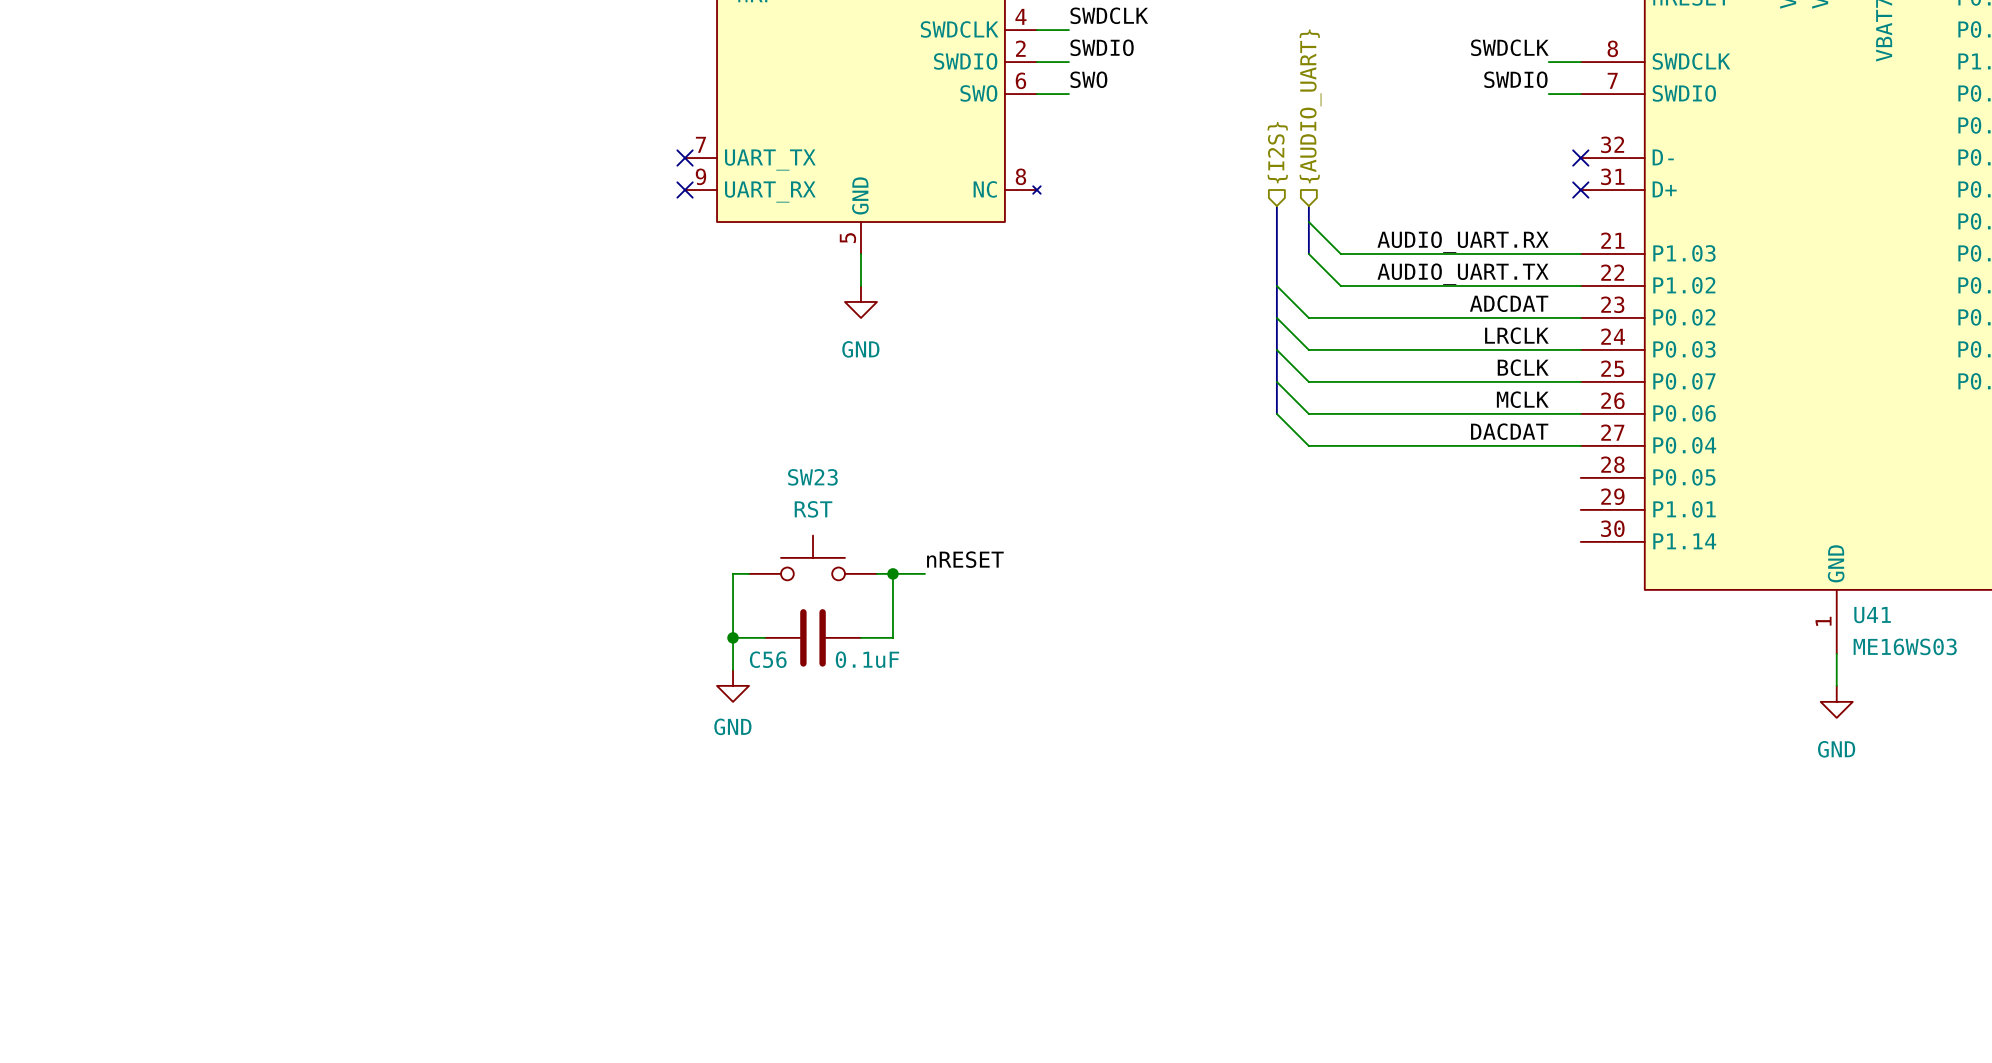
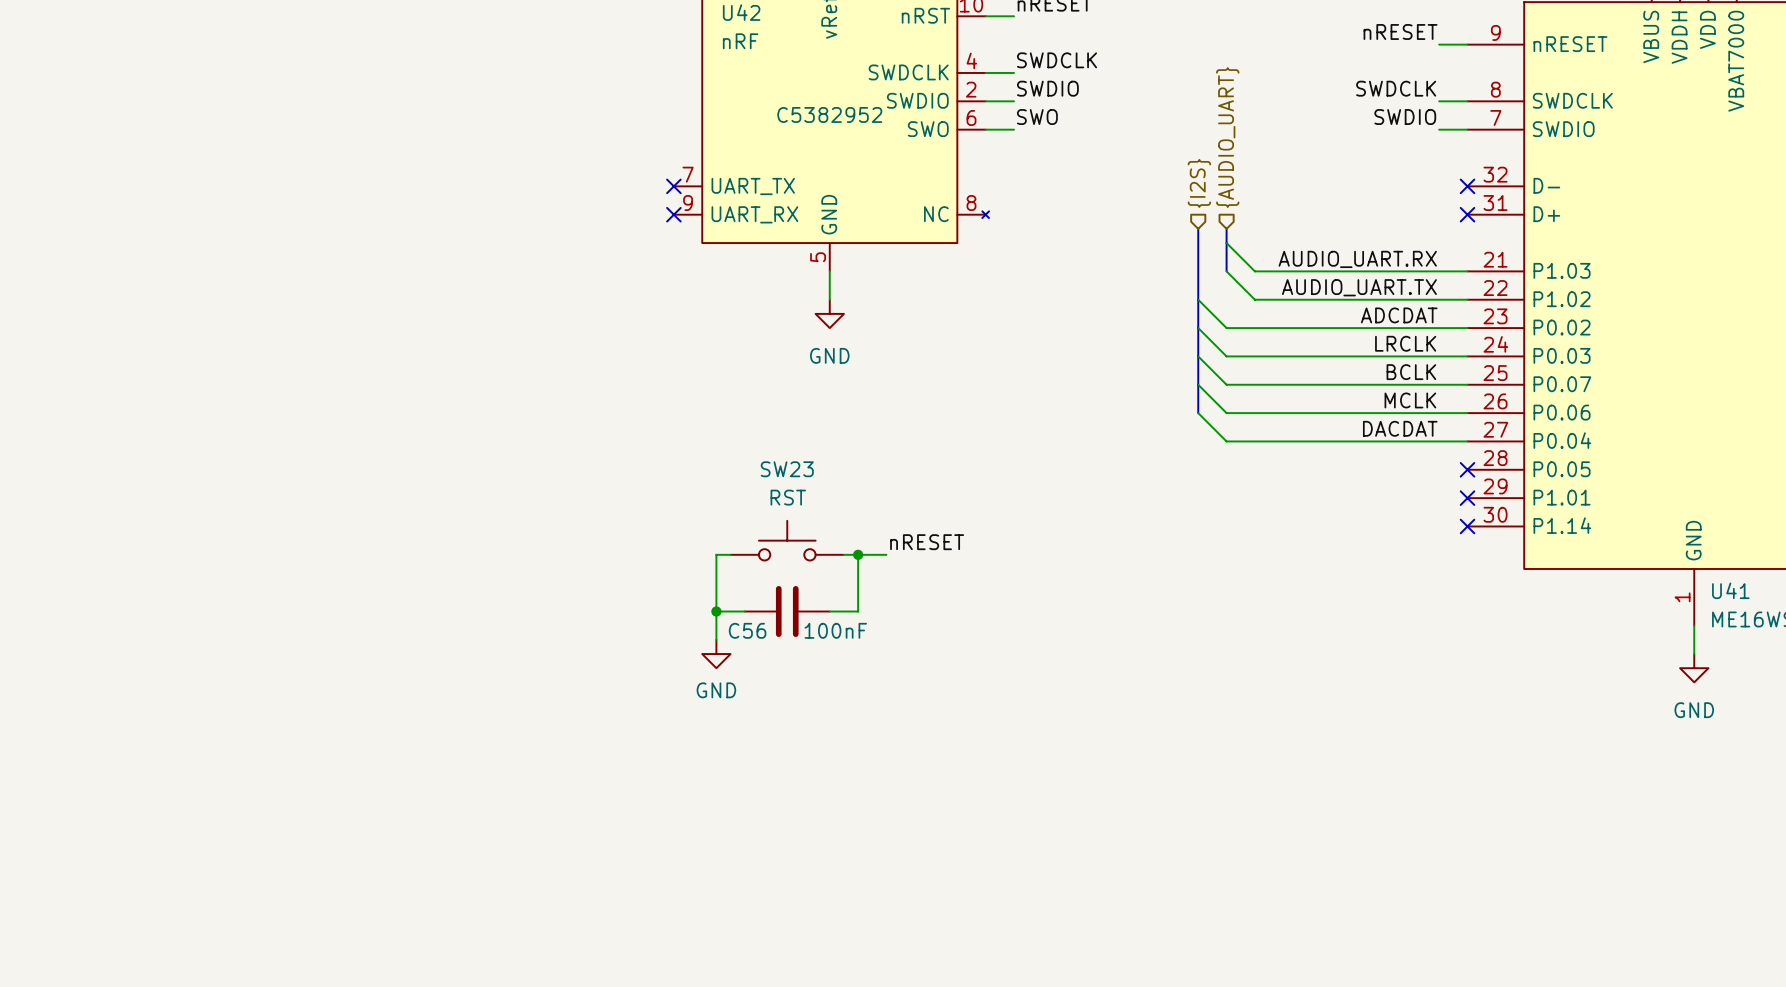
U42 text: none -> C5382952 (829, 114)
no-connect mark: none -> (1467, 469)
no-connect mark: none -> (1467, 498)
no-connect mark: none -> (1467, 526)
C56 value: 0.1uF (867, 659) -> 100nF (835, 630)

